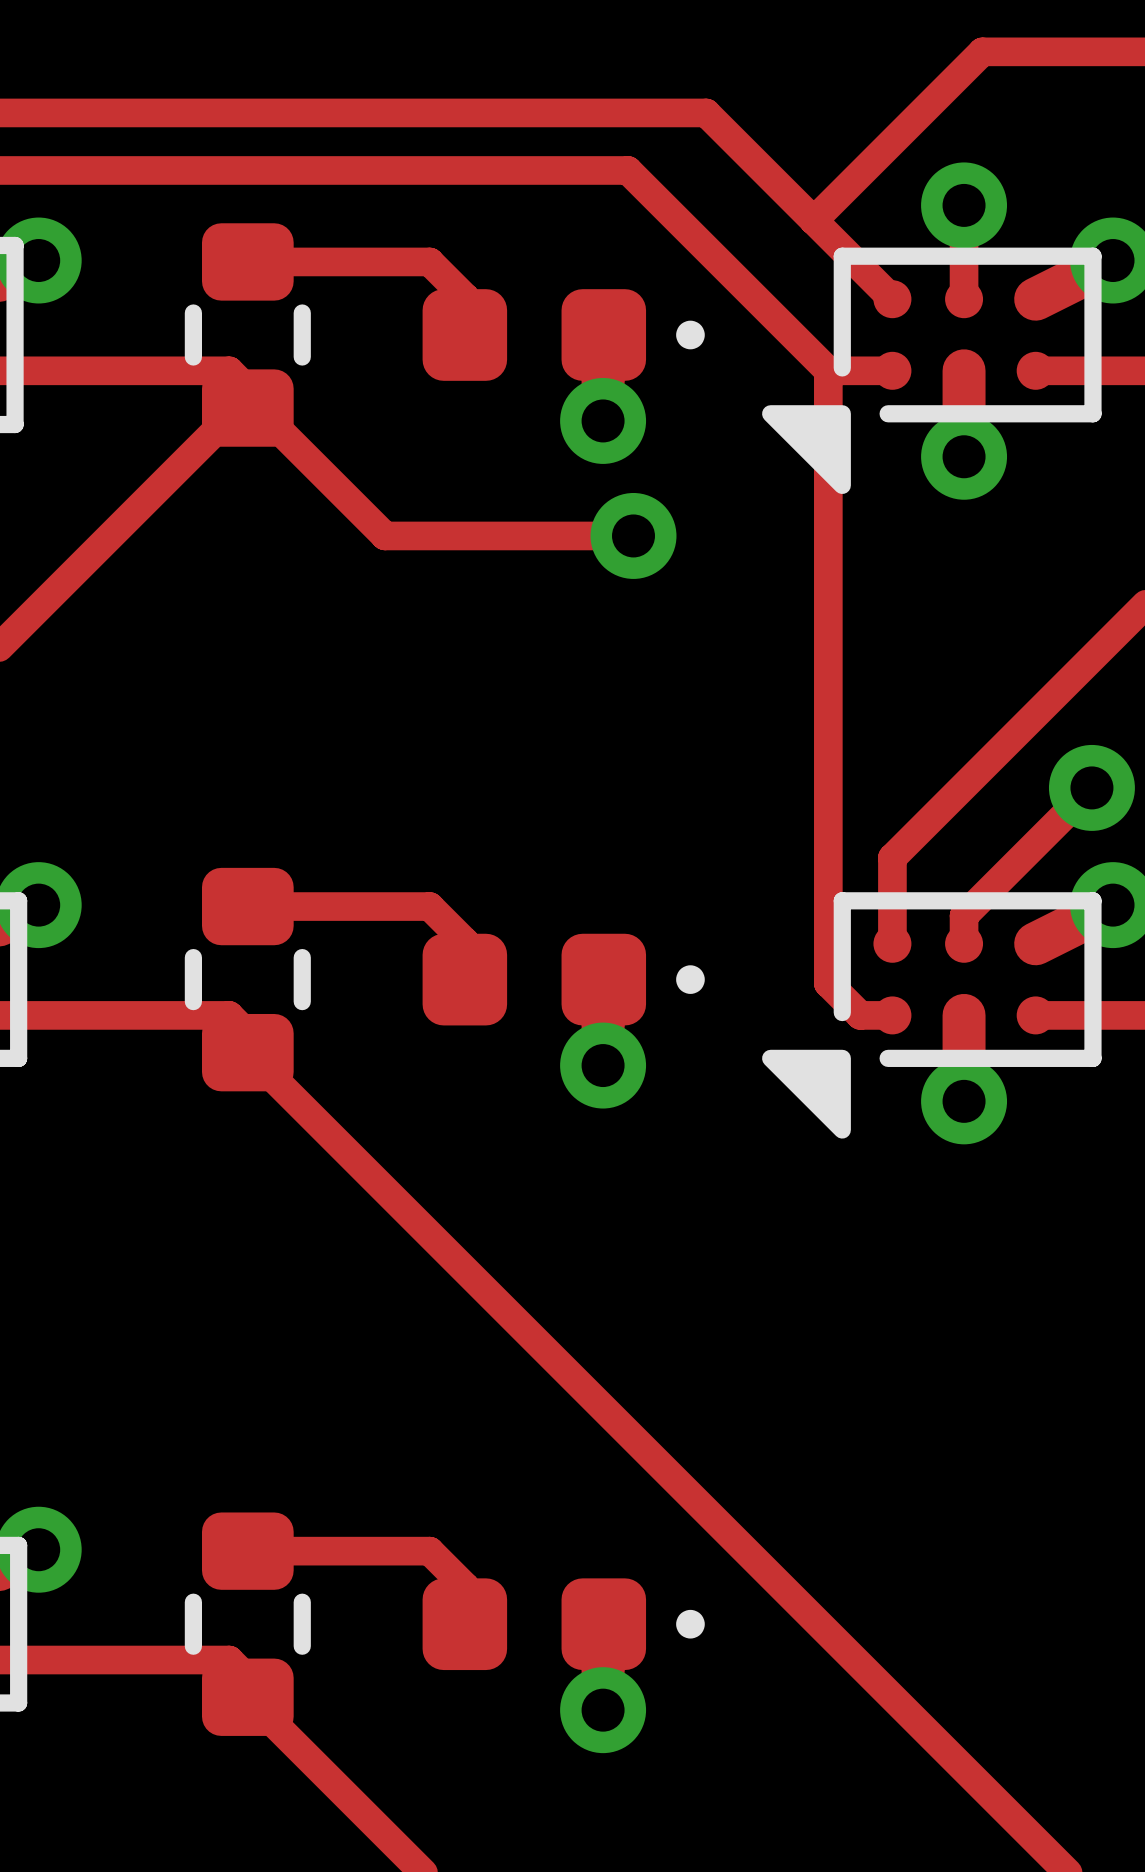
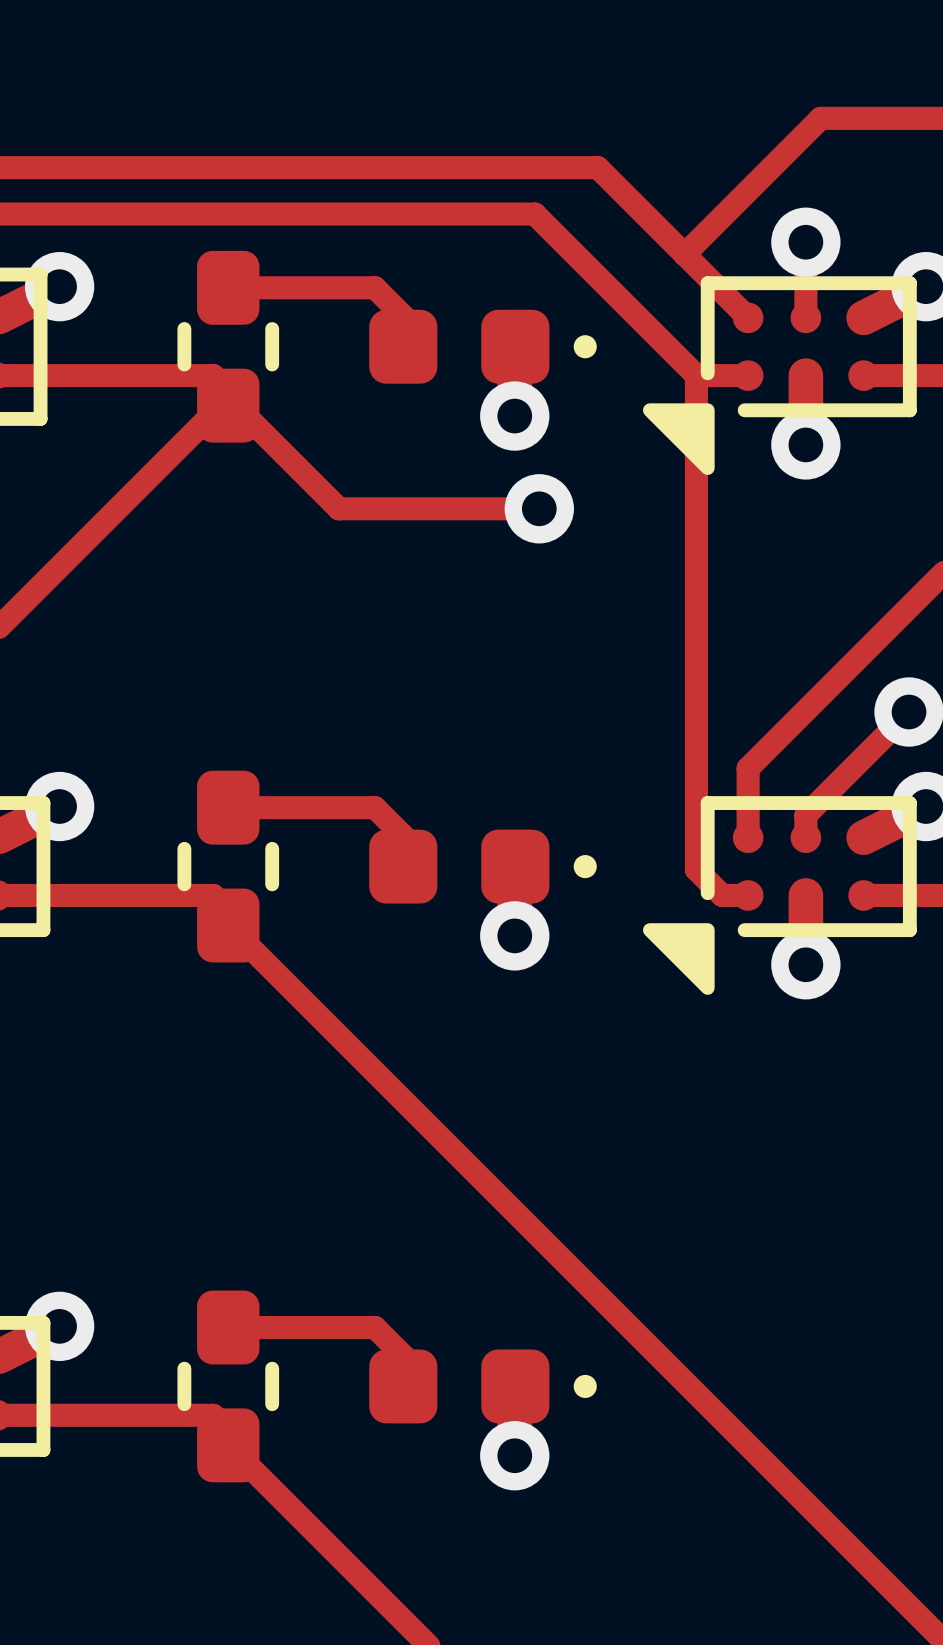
part footprint: [184, 223, 311, 447] -> [177, 250, 280, 443]
part footprint: [184, 867, 311, 1092] -> [177, 770, 280, 963]
part footprint: [184, 1512, 311, 1736] -> [177, 1290, 280, 1483]

